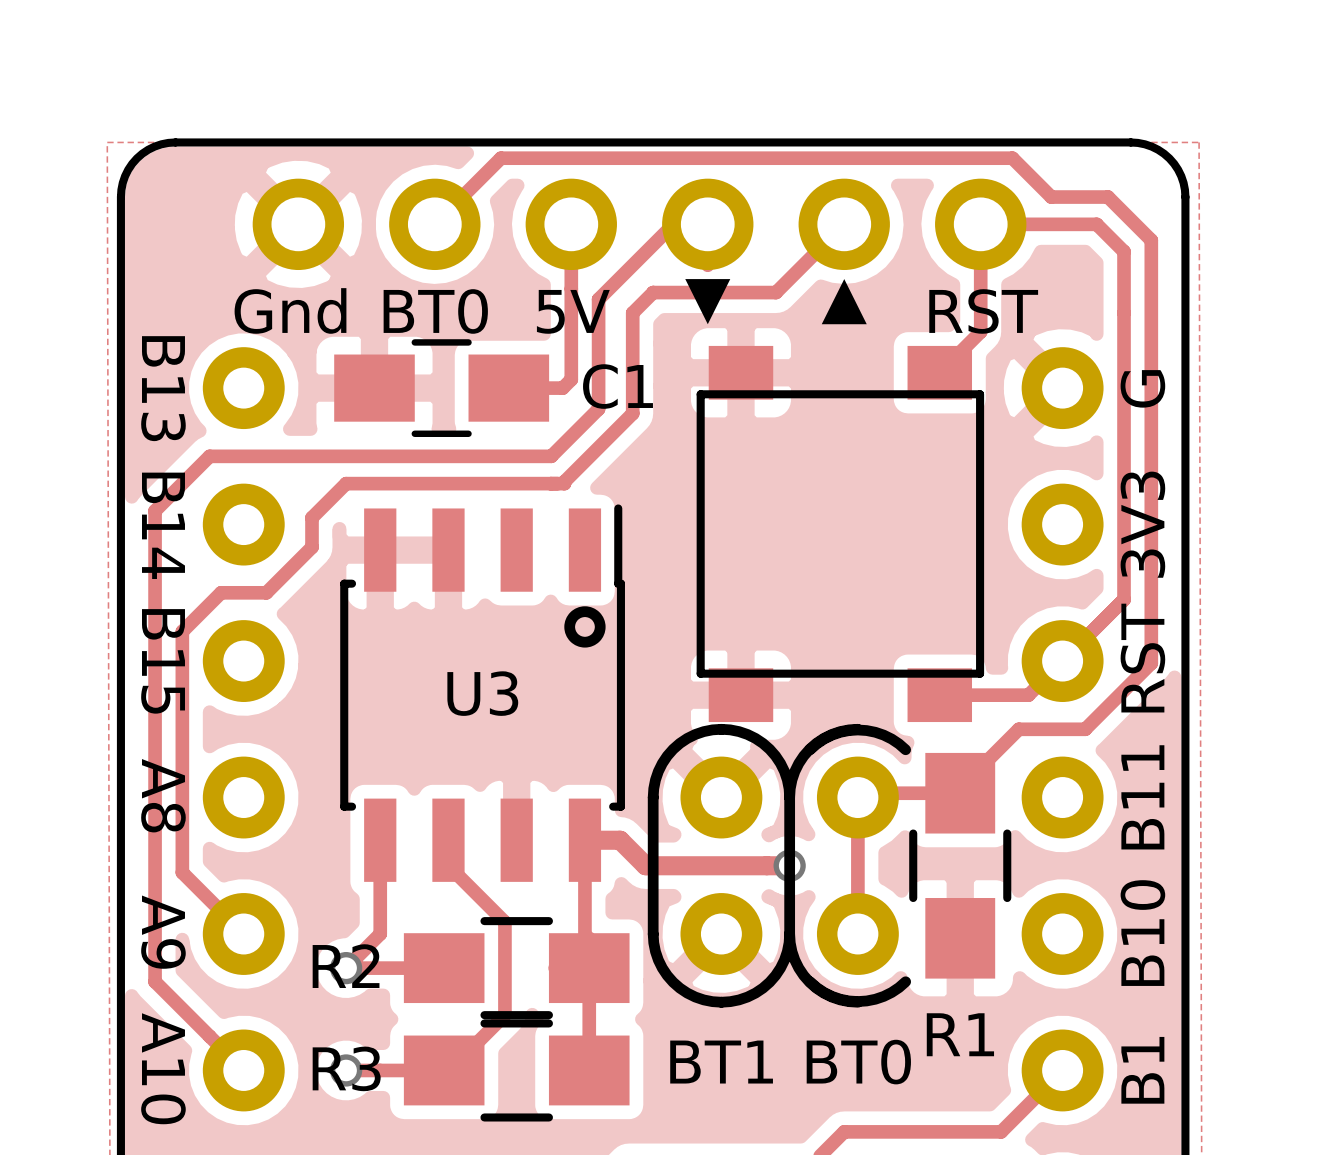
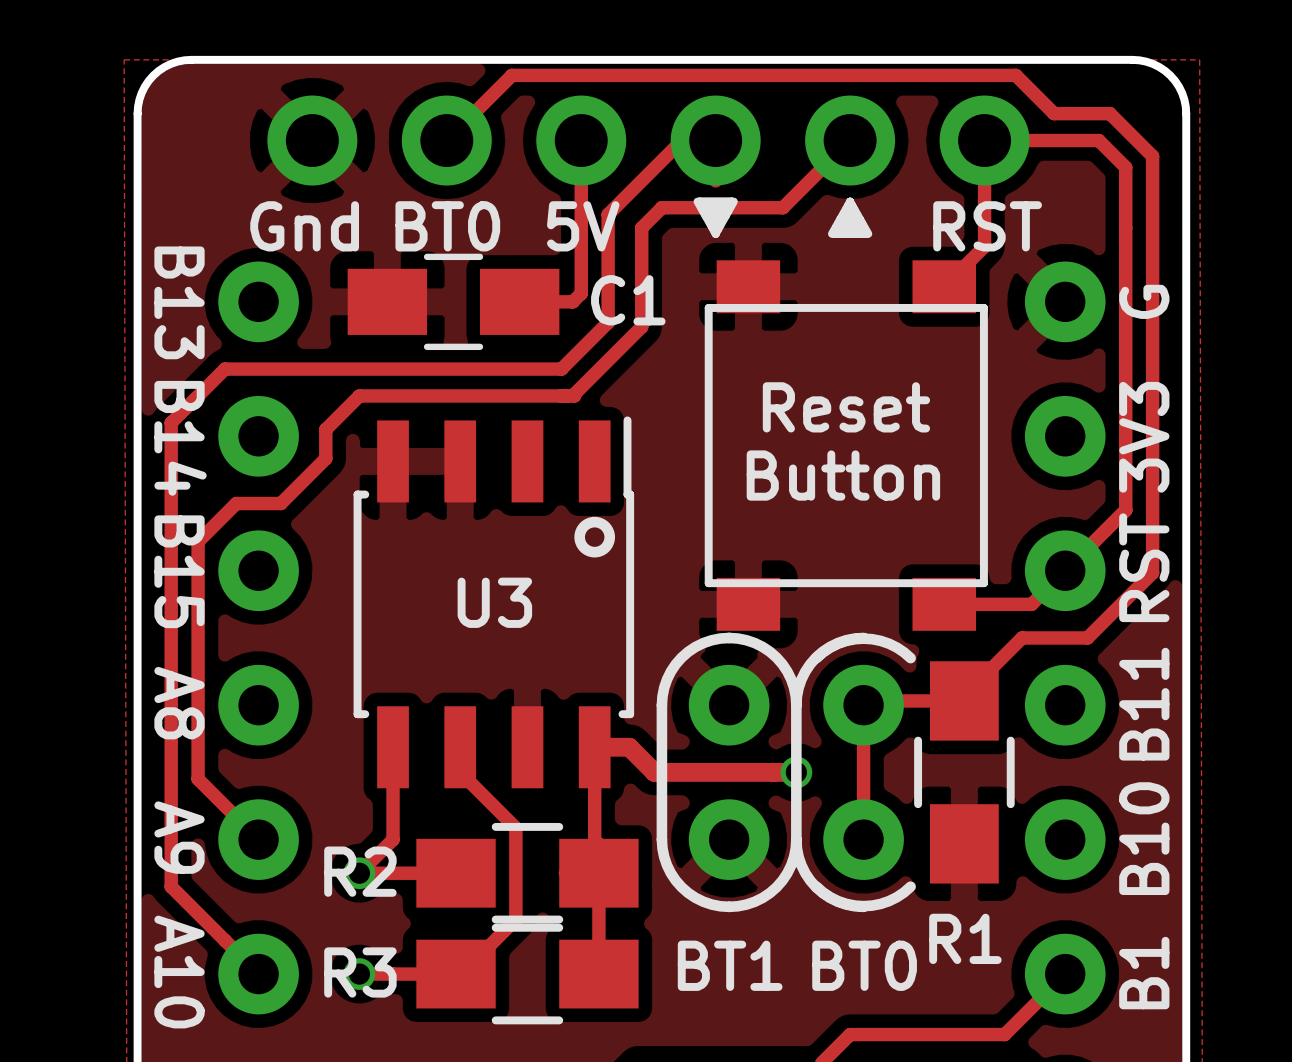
text: none -> Reset (846, 407)
text: none -> Button (843, 475)

